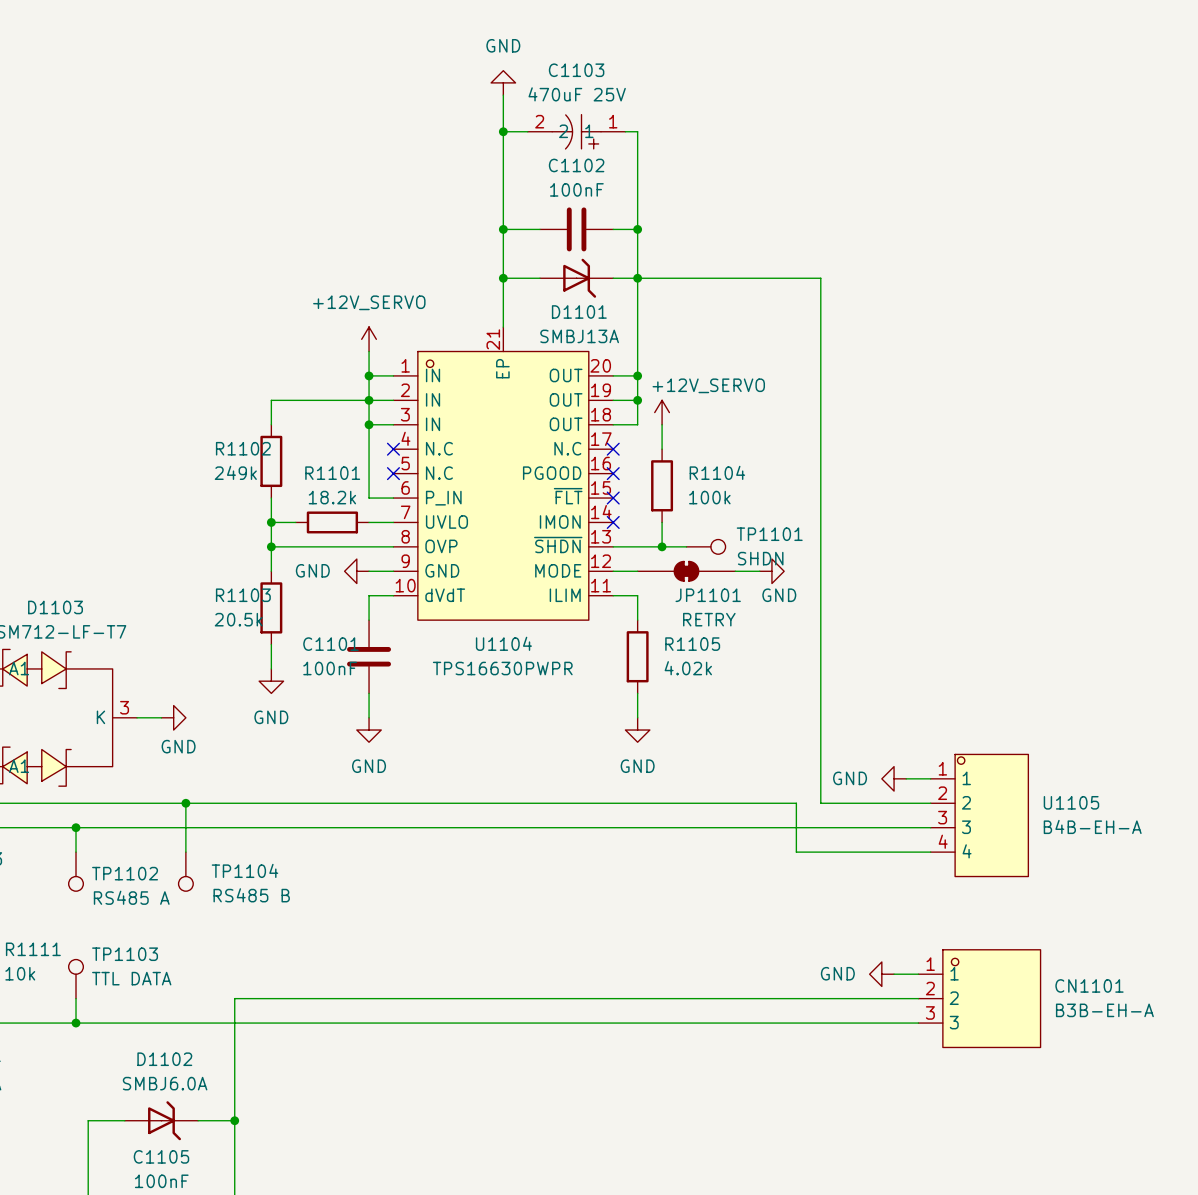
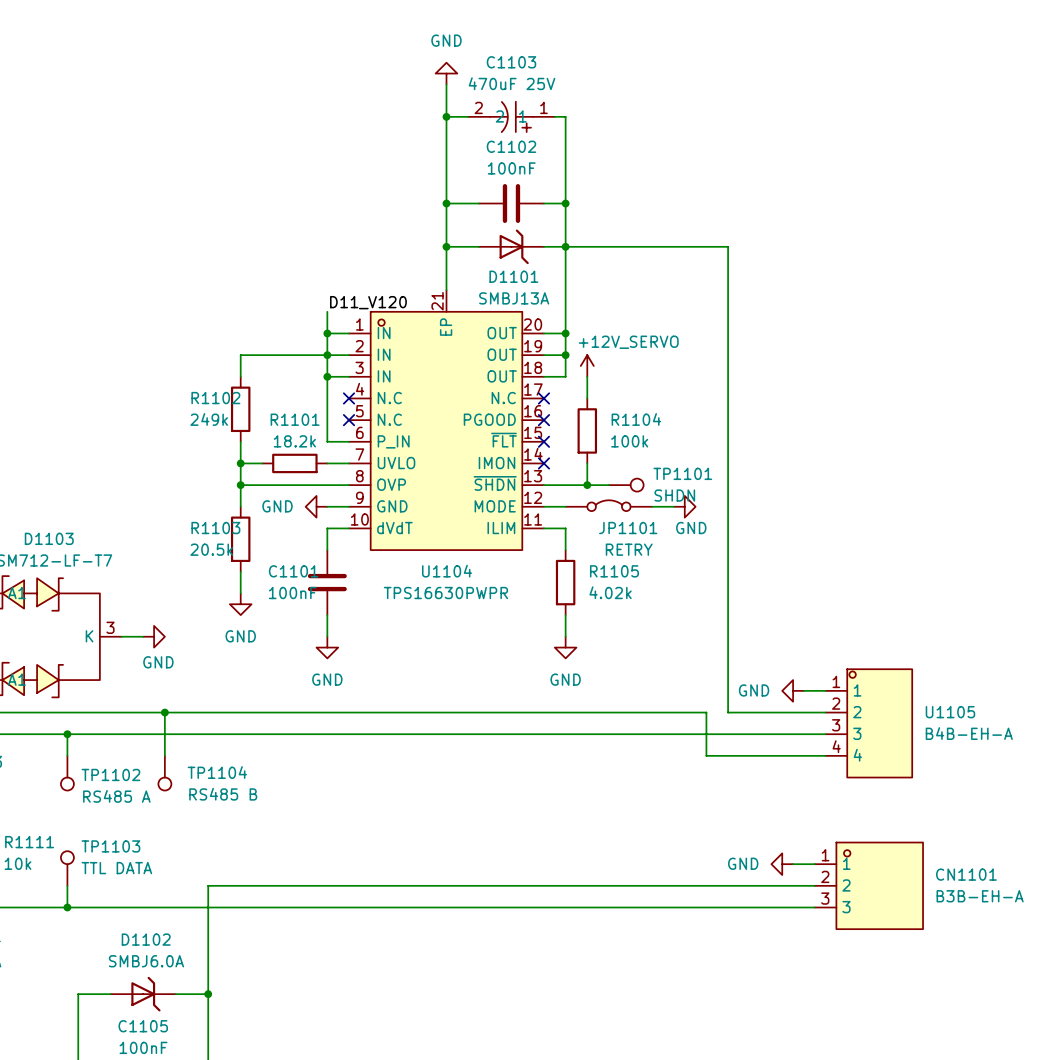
power symbol: +12V_SERVO (369, 339) -> none
label: none -> D11_V120 (368, 302)
JP1101 symbol: [637, 560, 736, 582] -> [565, 500, 653, 512]

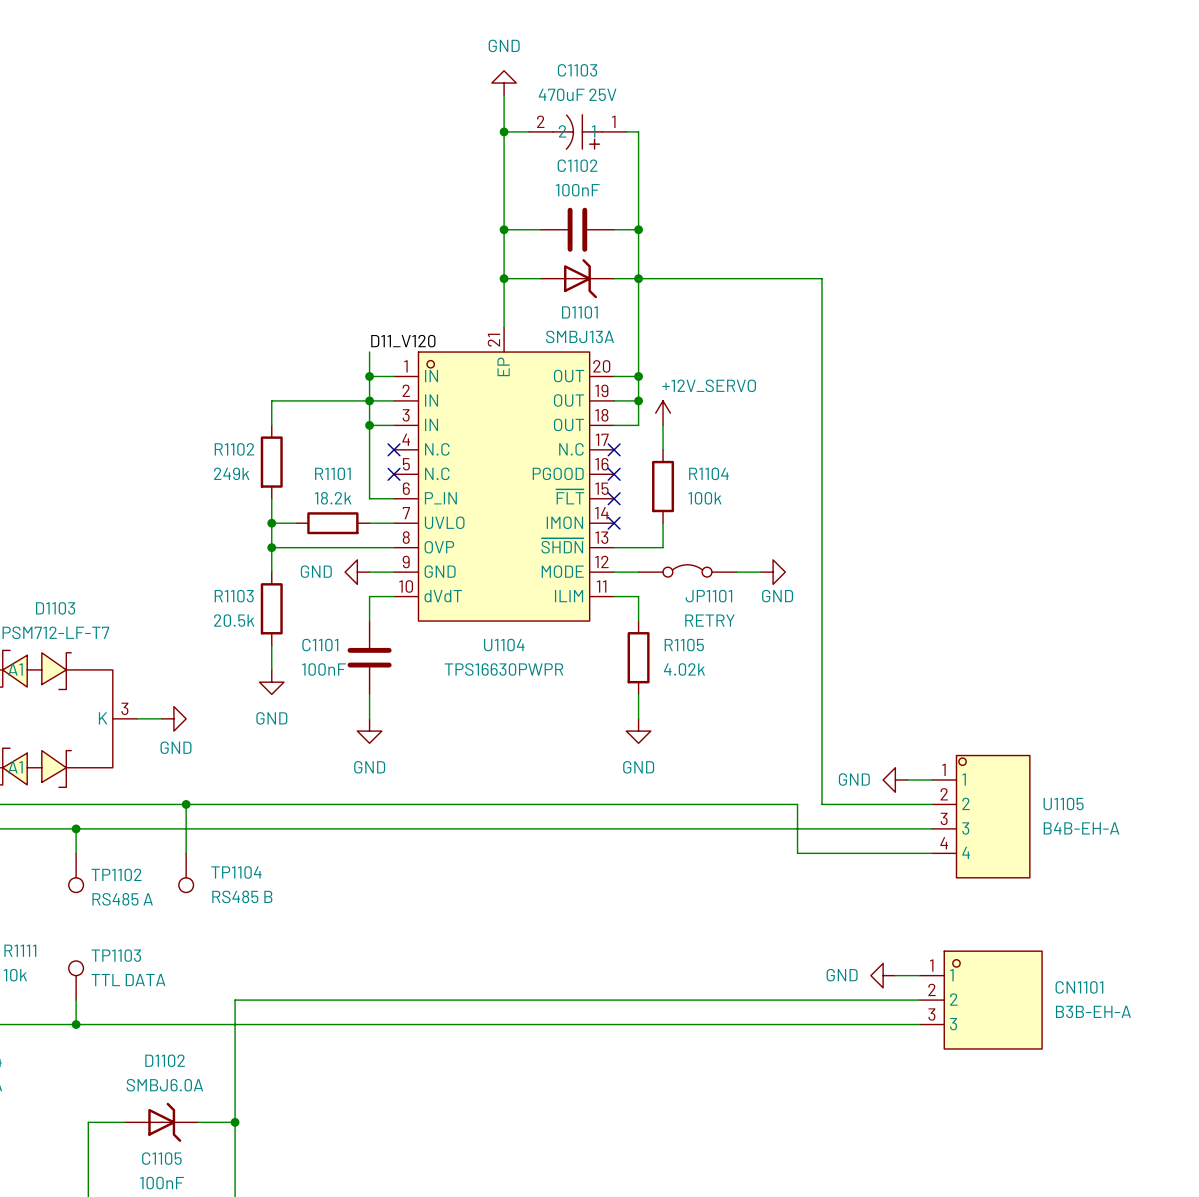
wire: (587, 485) (608, 485) -> none
junction: (587, 485) -> none
TP1101: SHDN (626, 485) -> none

